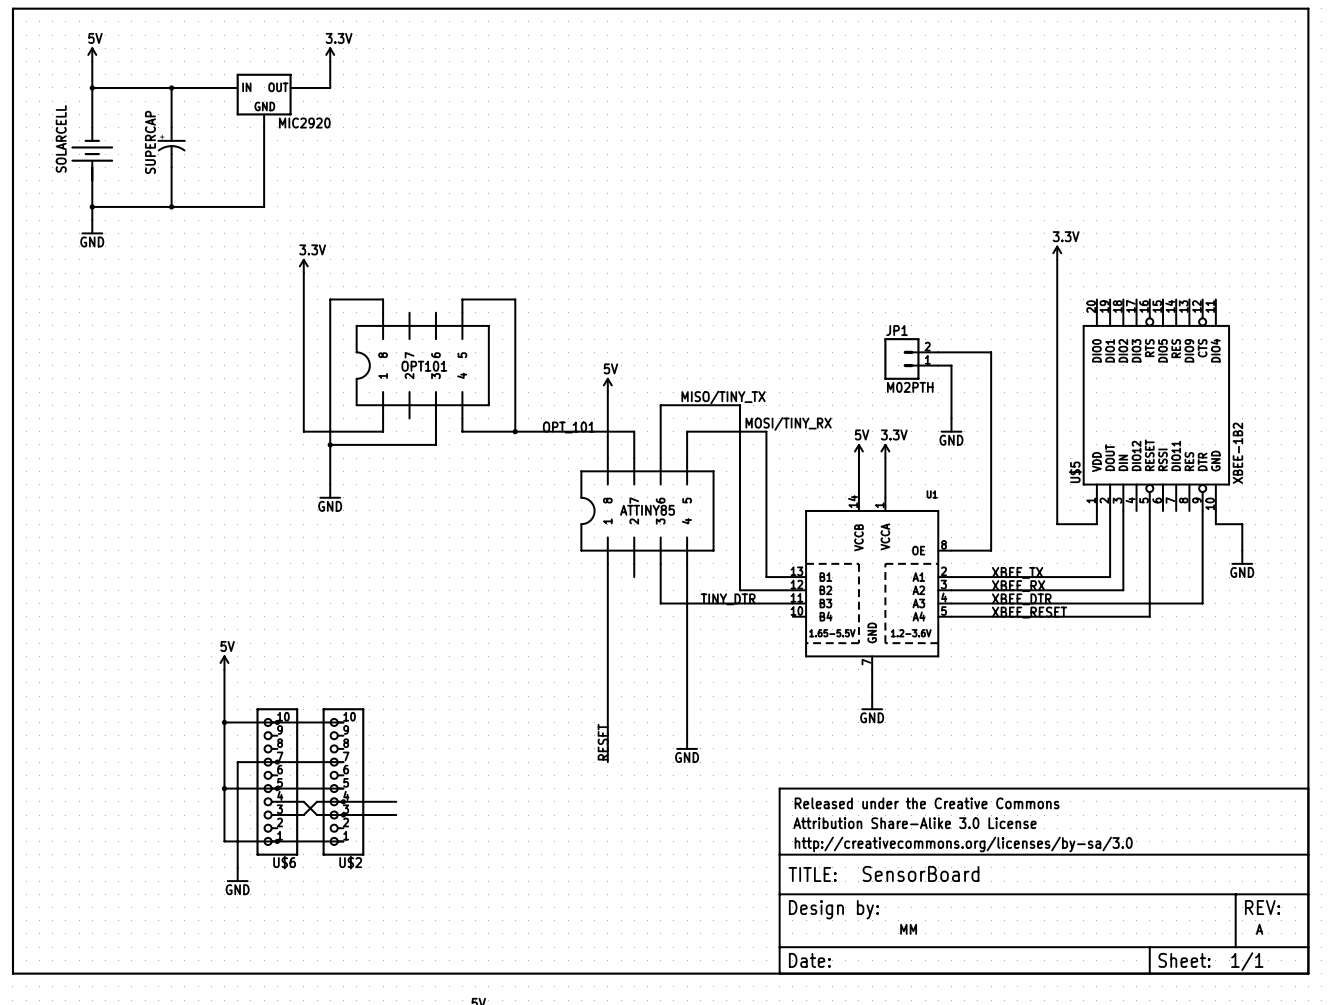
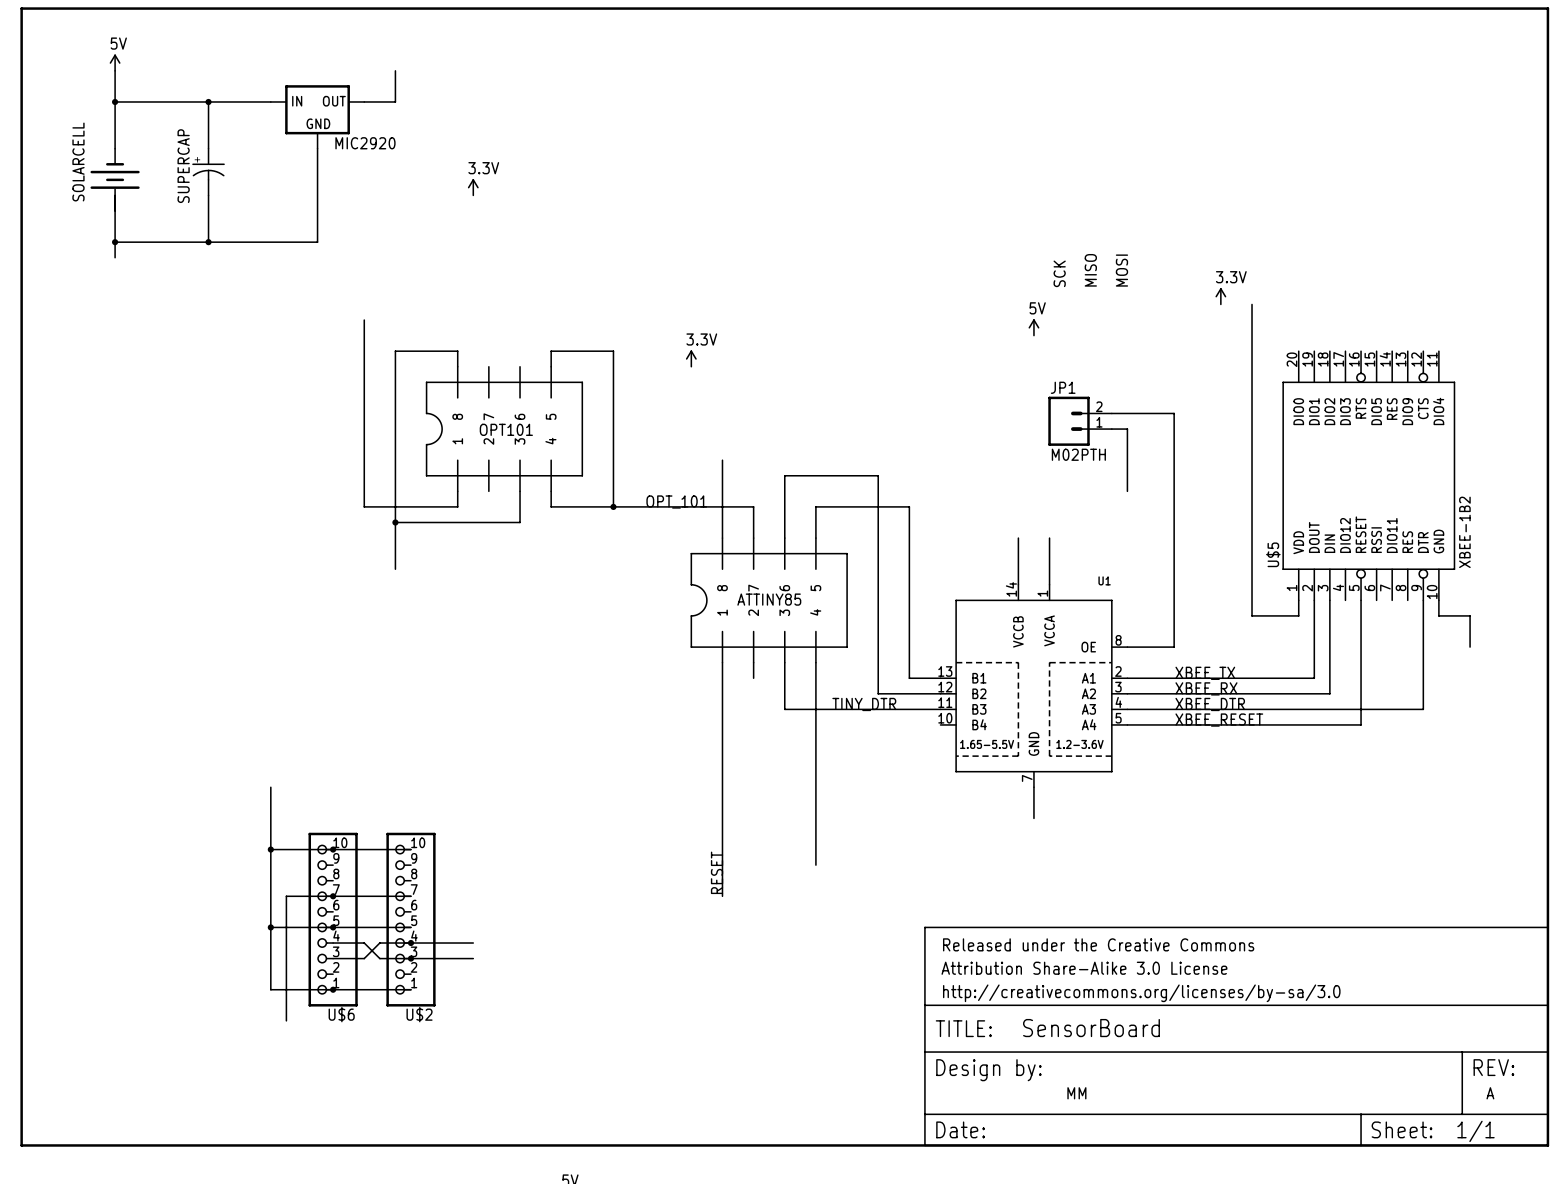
power symbol: 3.3V (330, 54) -> none
power symbol: none -> 3.3V (473, 187)
power symbol: GND (92, 227) -> none
label: none -> MISO (1090, 270)
label: none -> MOSI (1121, 270)
label: none -> SCK (1059, 273)
power symbol position: 3.3V (1057, 252) -> 3.3V (1220, 296)
power symbol: 3.3V (303, 266) -> none
power symbol: none -> 5V (1033, 327)
power symbol: none -> 3.3V (691, 358)
power symbol: 5V (607, 385) -> none
label: MISO/TINY_TX (723, 397) -> none
label: MOSI/TINY_RX (788, 423) -> none
power symbol: GND (951, 425) -> none
power symbol: 5V (858, 451) -> none
power symbol: 3.3V (885, 451) -> none
power symbol: GND (330, 491) -> none
power symbol: GND (1242, 557) -> none
power symbol: 5V (224, 662) -> none
power symbol: GND (872, 702) -> none
power symbol: GND (687, 742) -> none
power symbol: GND (237, 874) -> none

